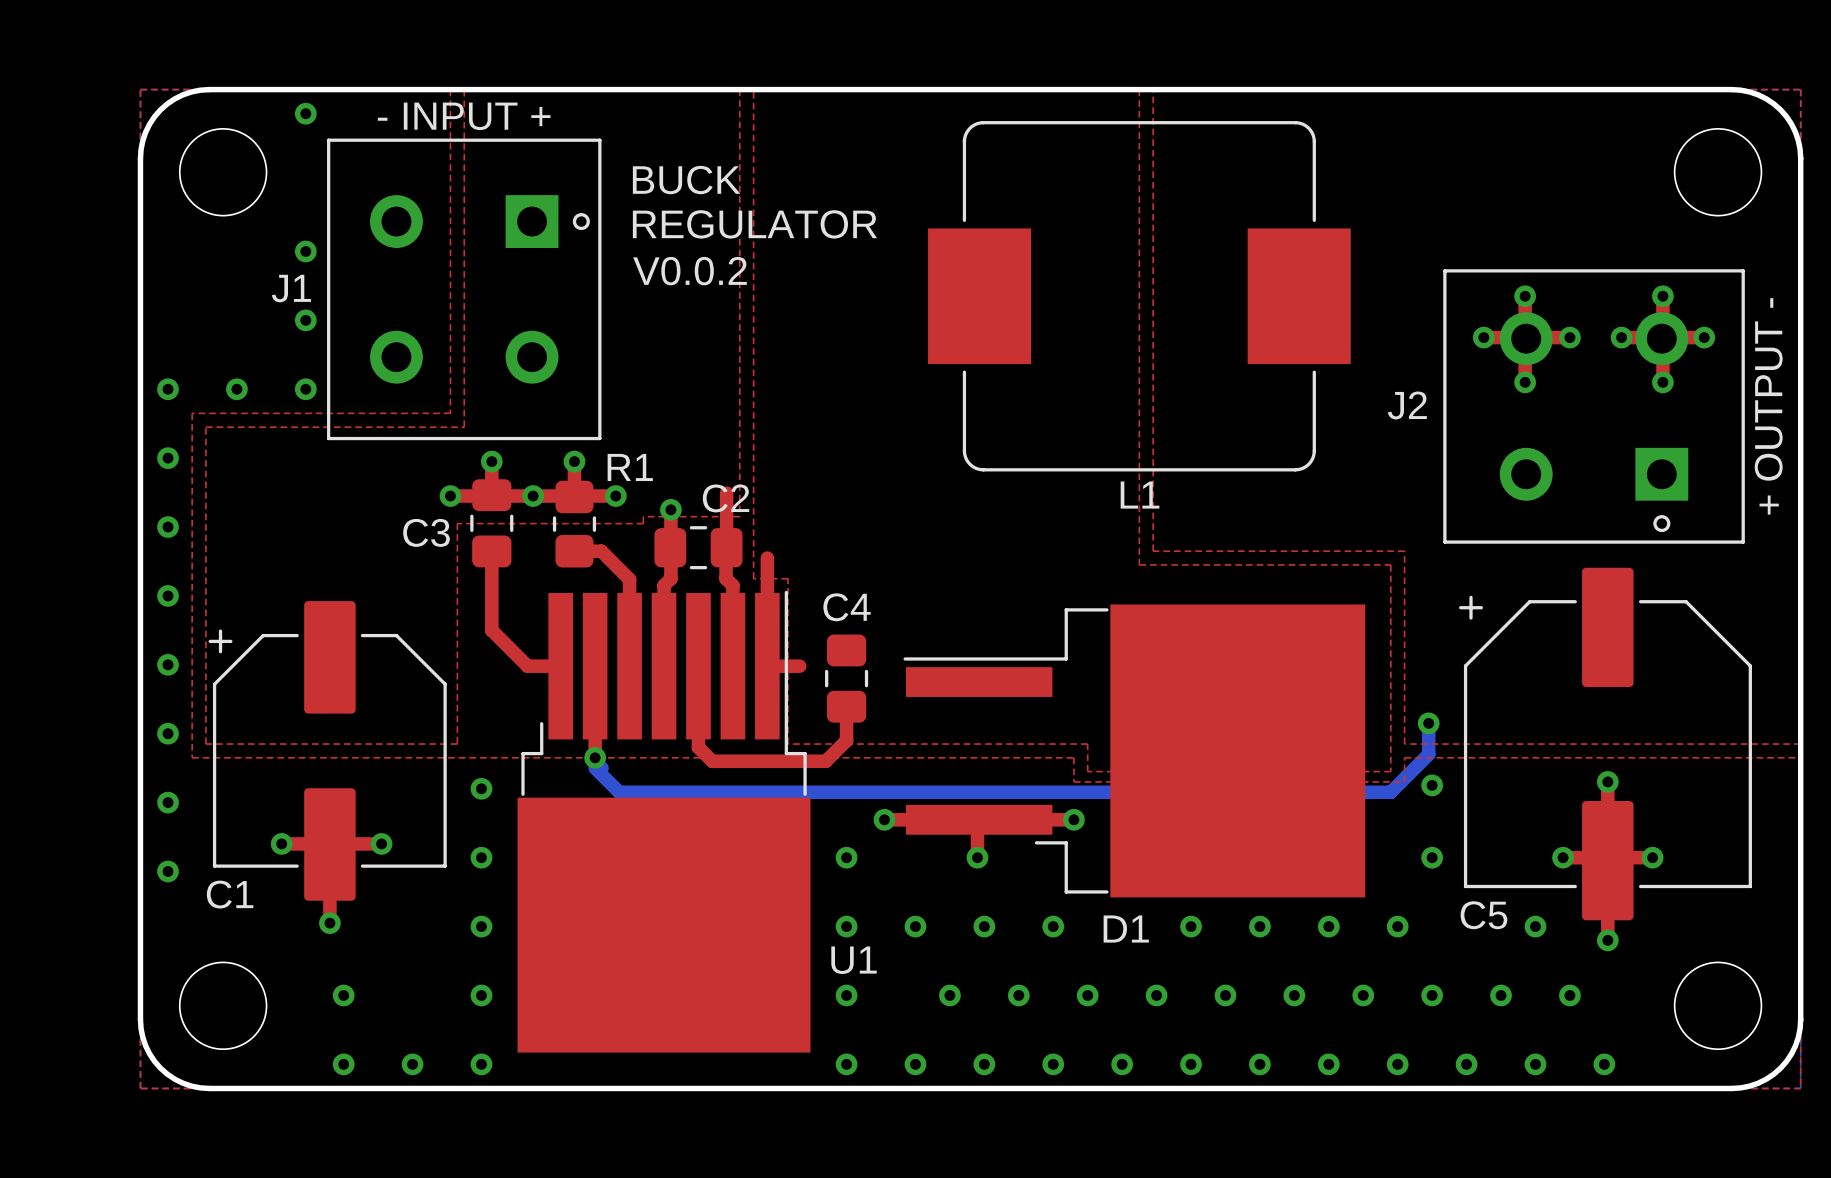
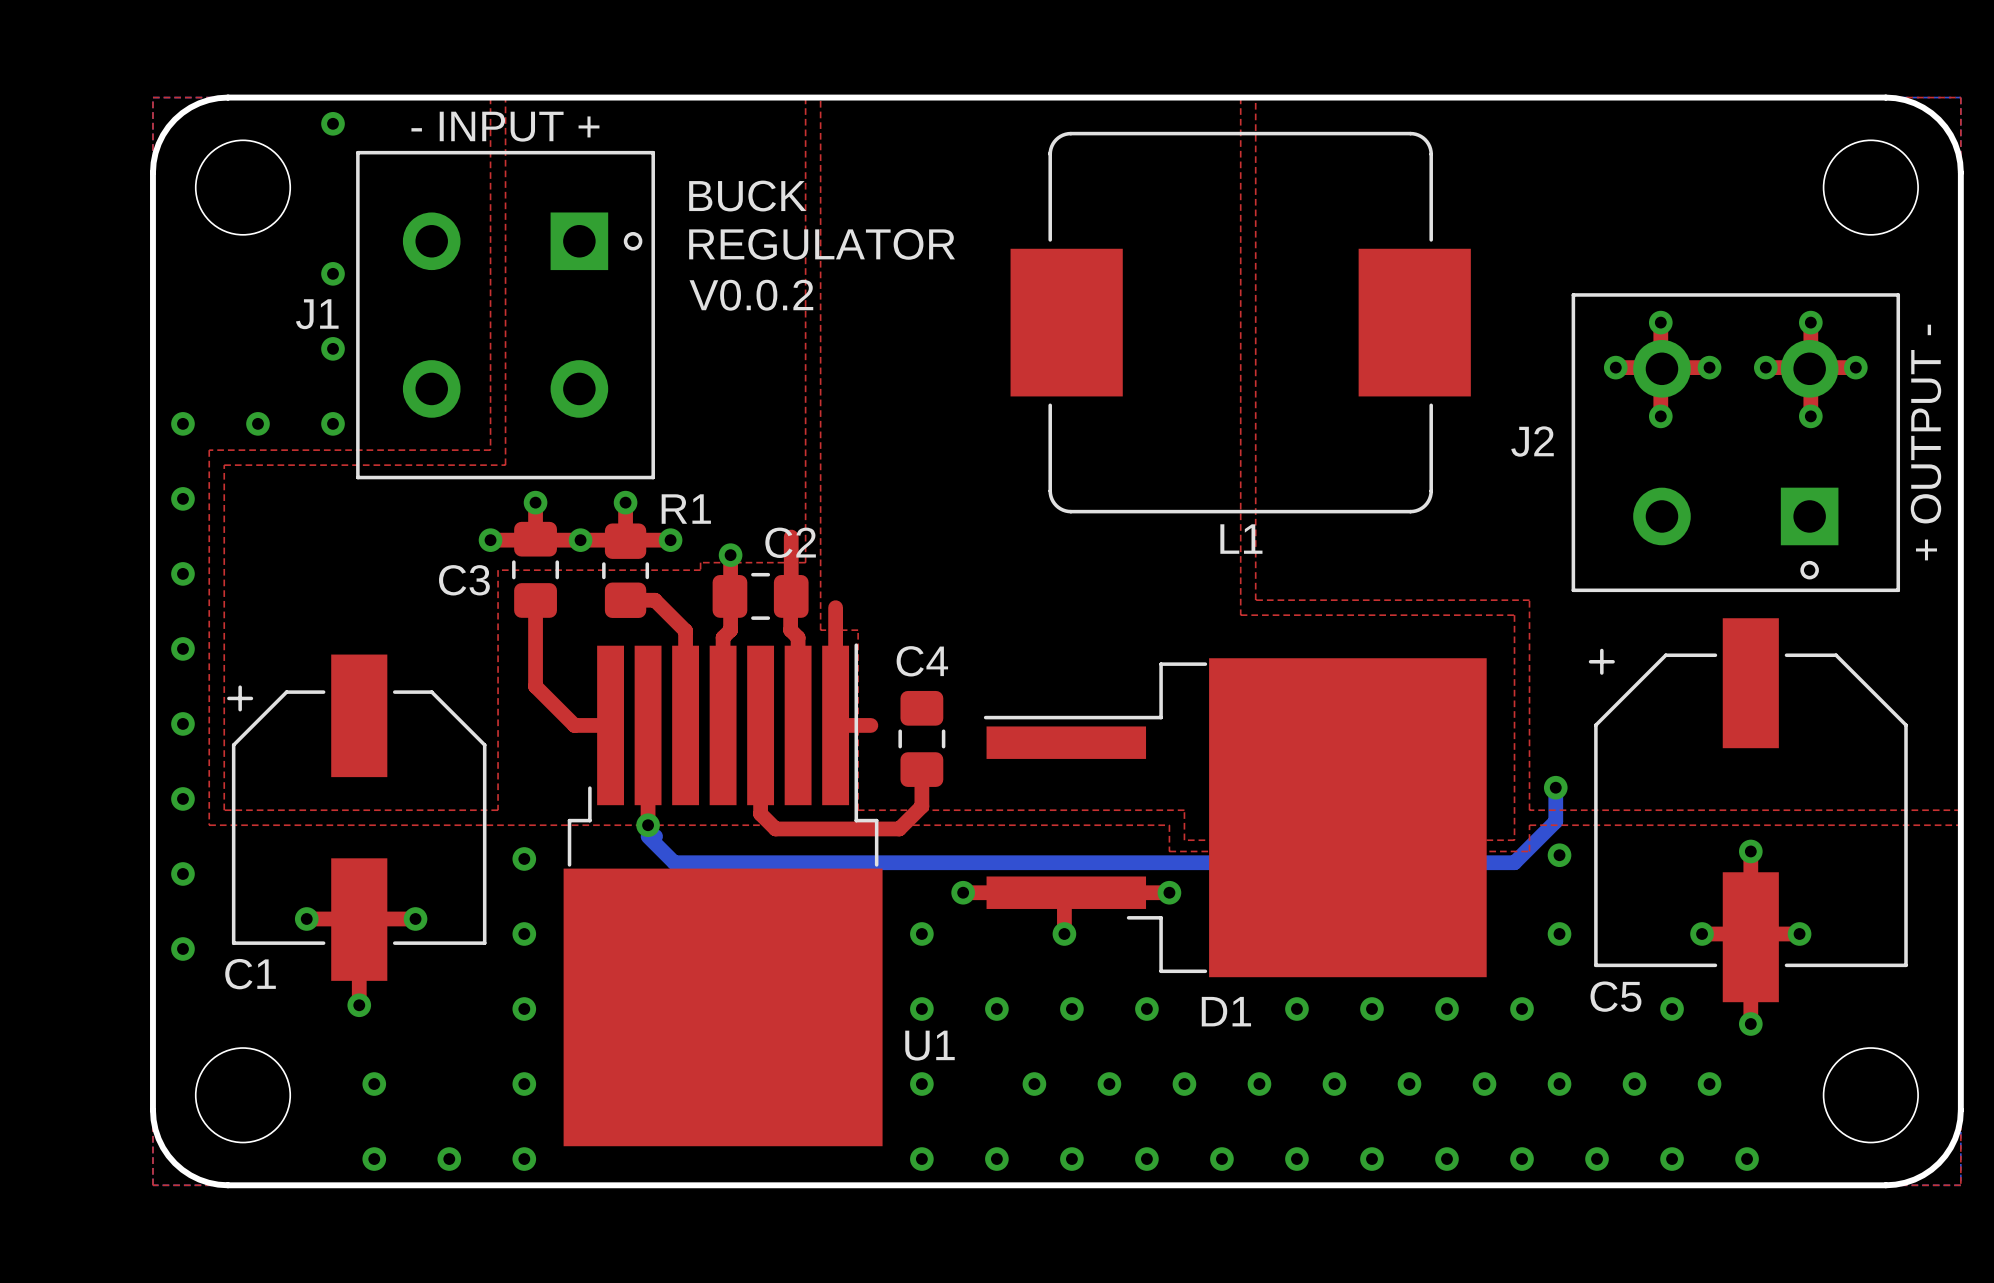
C5 footprint: [1459, 567, 1752, 921] -> [1588, 618, 1908, 1003]
C1 footprint: [208, 601, 447, 901] -> [227, 654, 487, 981]

